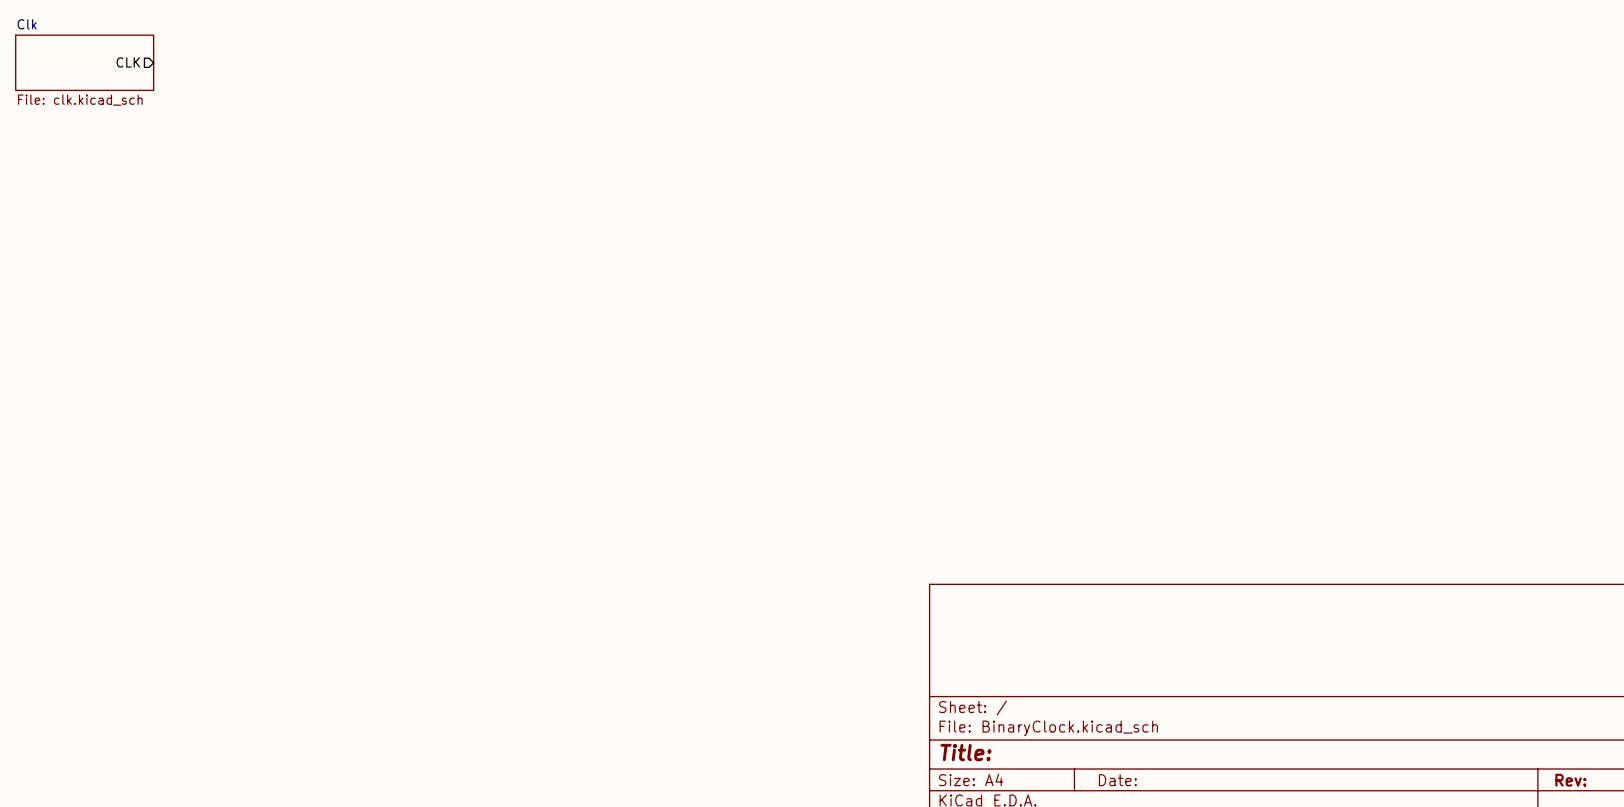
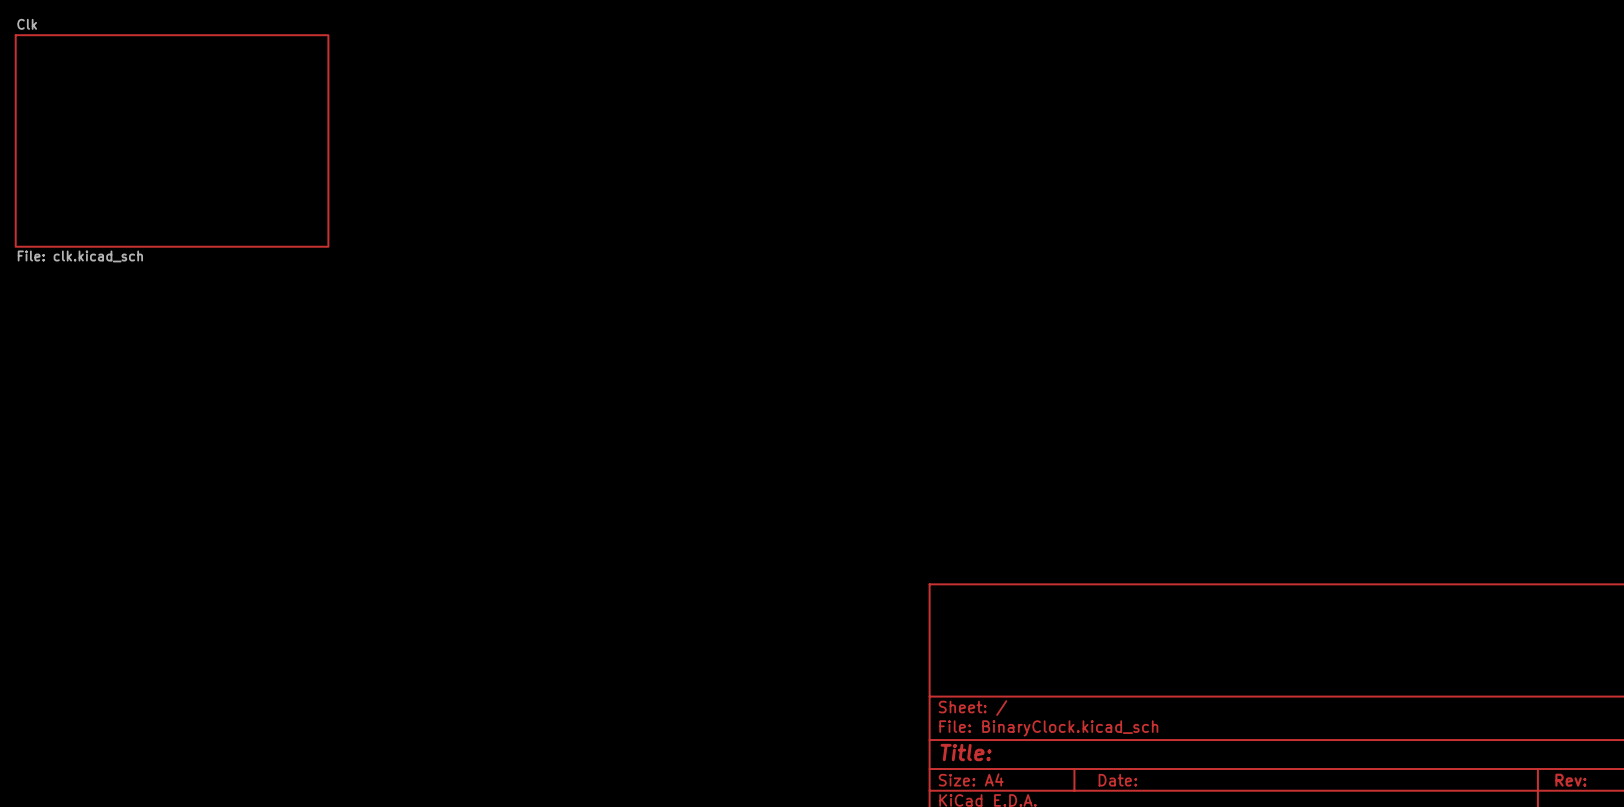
sheet Clk: File: clk.kicad_sch (84, 62) -> none
sheet pin: CLK (128, 62) -> none
sheet Clk: none -> File: clk.kicad_sch (172, 140)

